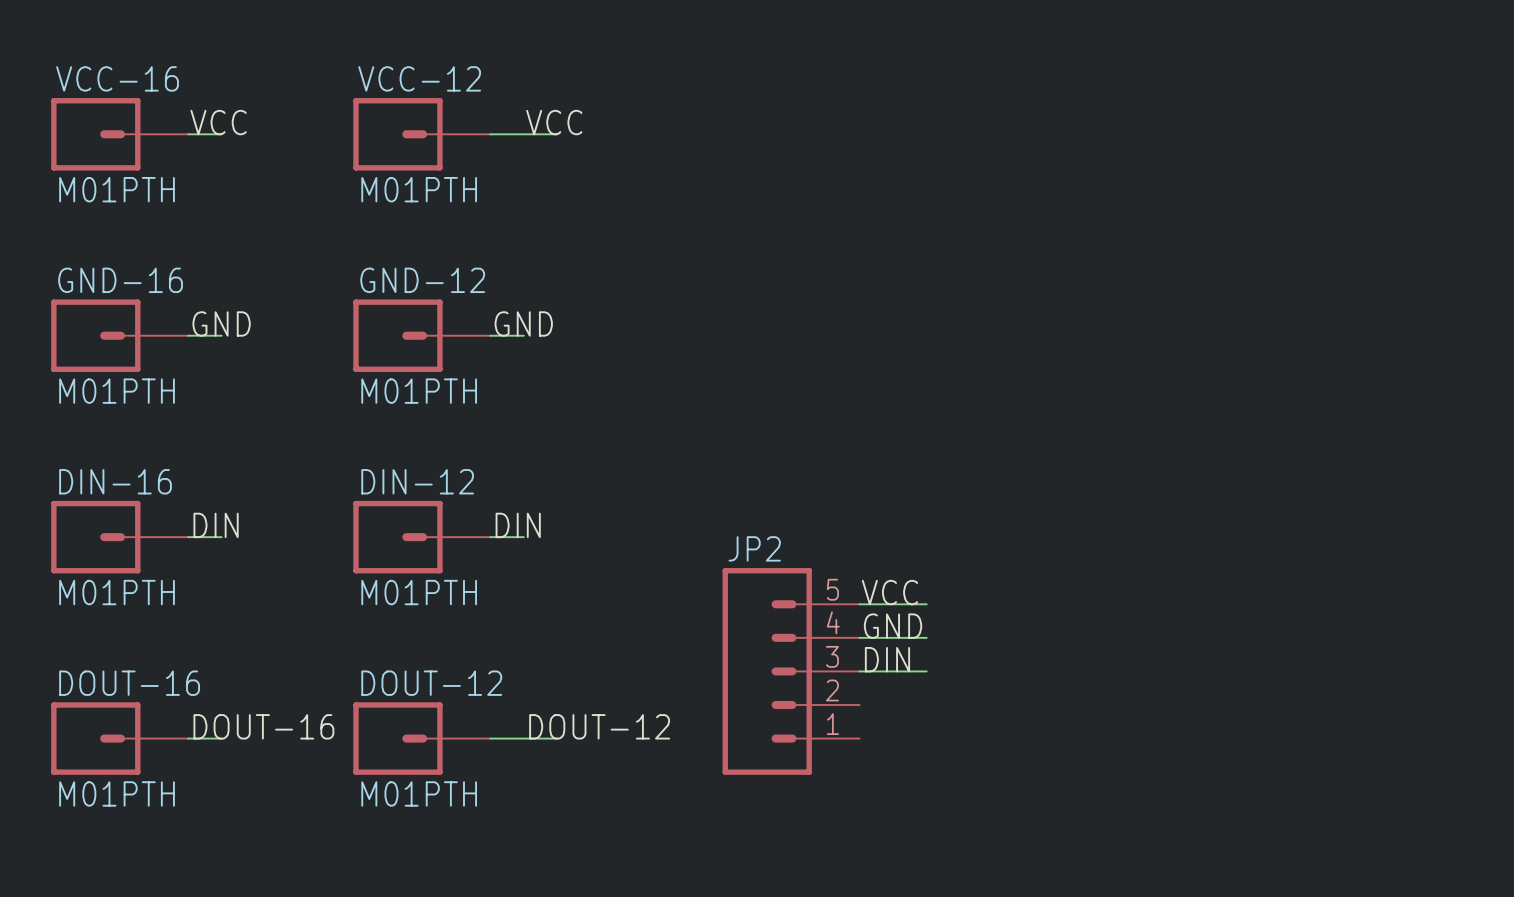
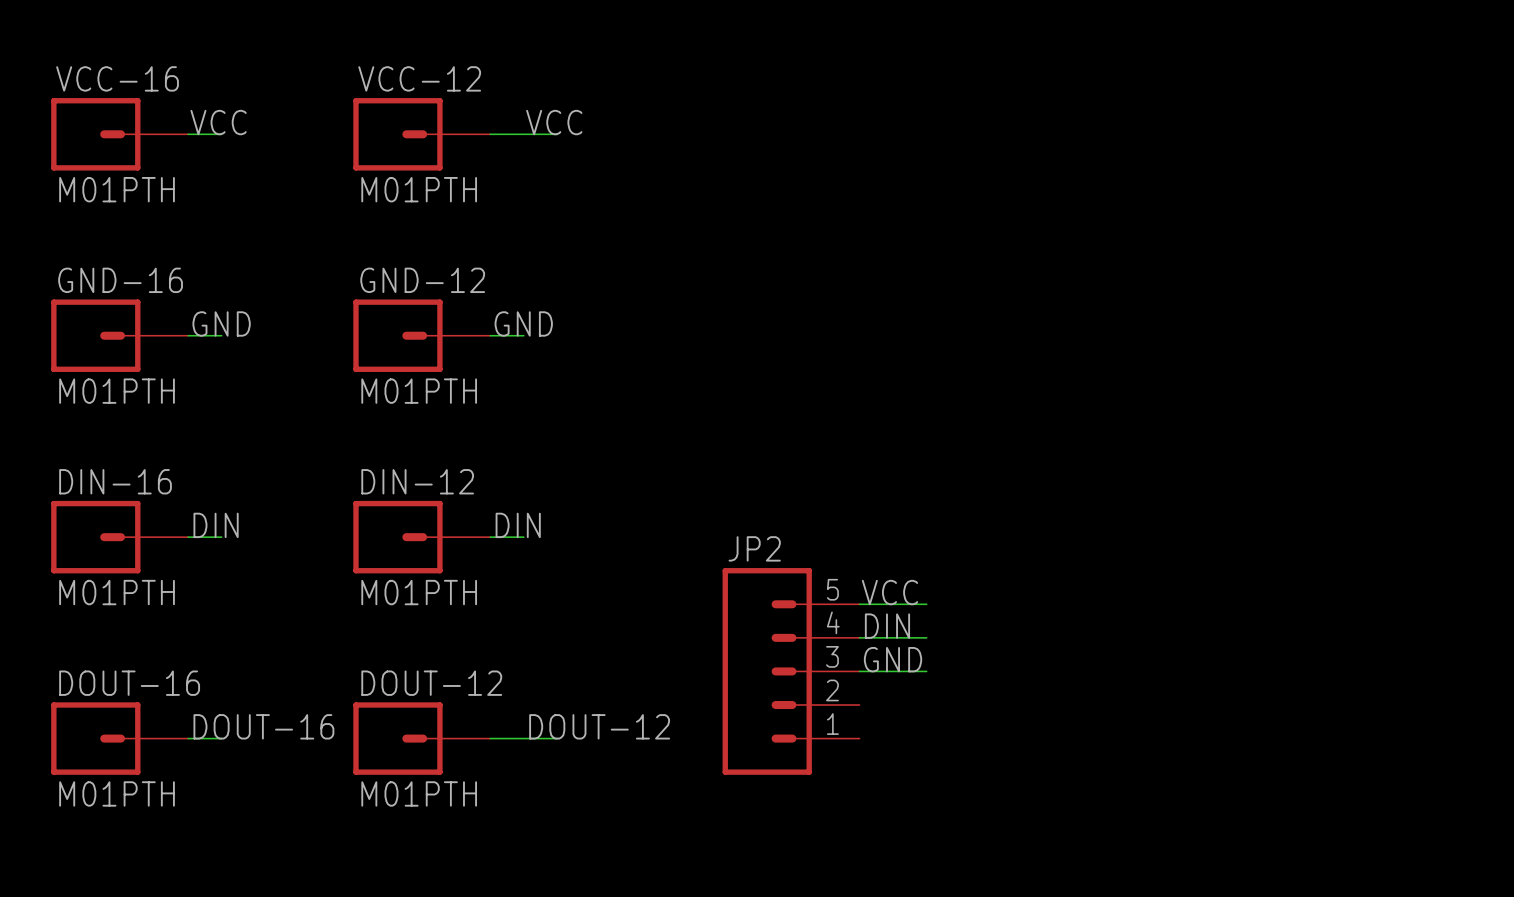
label: GND (893, 626) -> DIN (887, 626)
label: DIN (887, 659) -> GND (893, 659)

